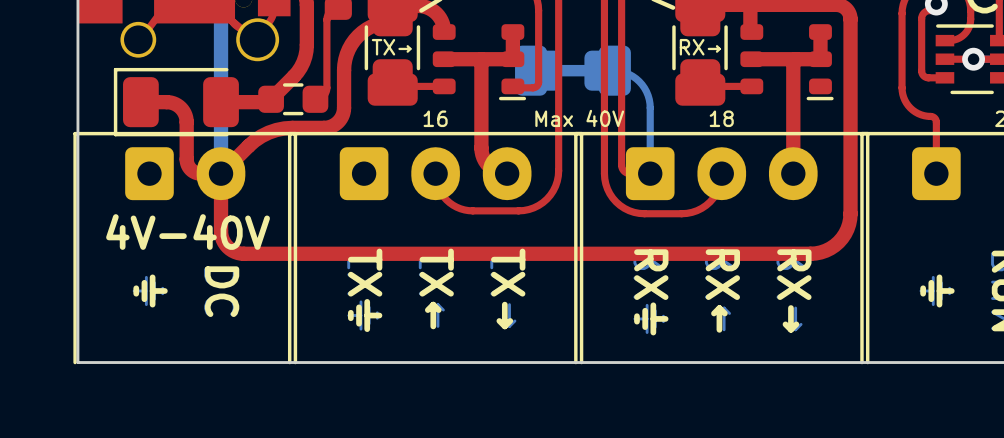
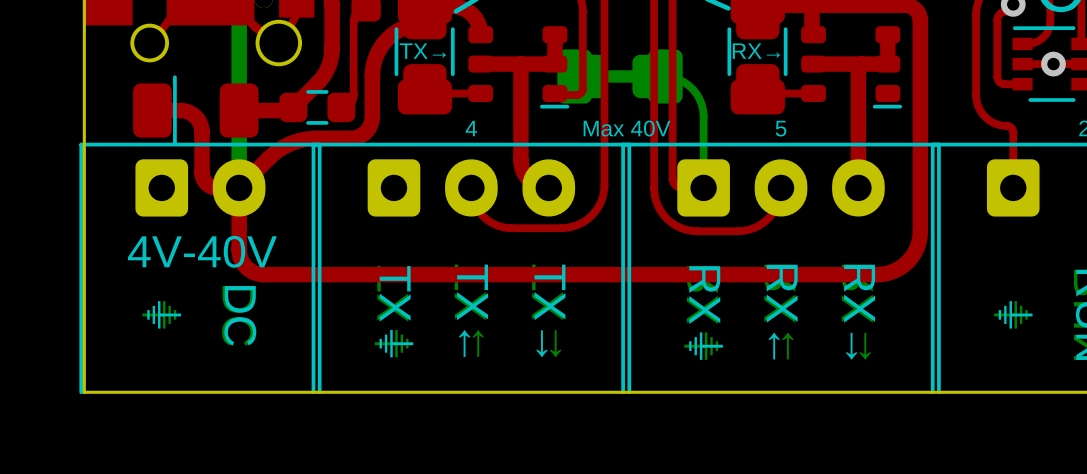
part footprint: [113, 67, 239, 137] -> [133, 75, 259, 146]
text: 16 (435, 118) -> 4 (471, 128)
text: 18 (721, 118) -> 5 (781, 128)

